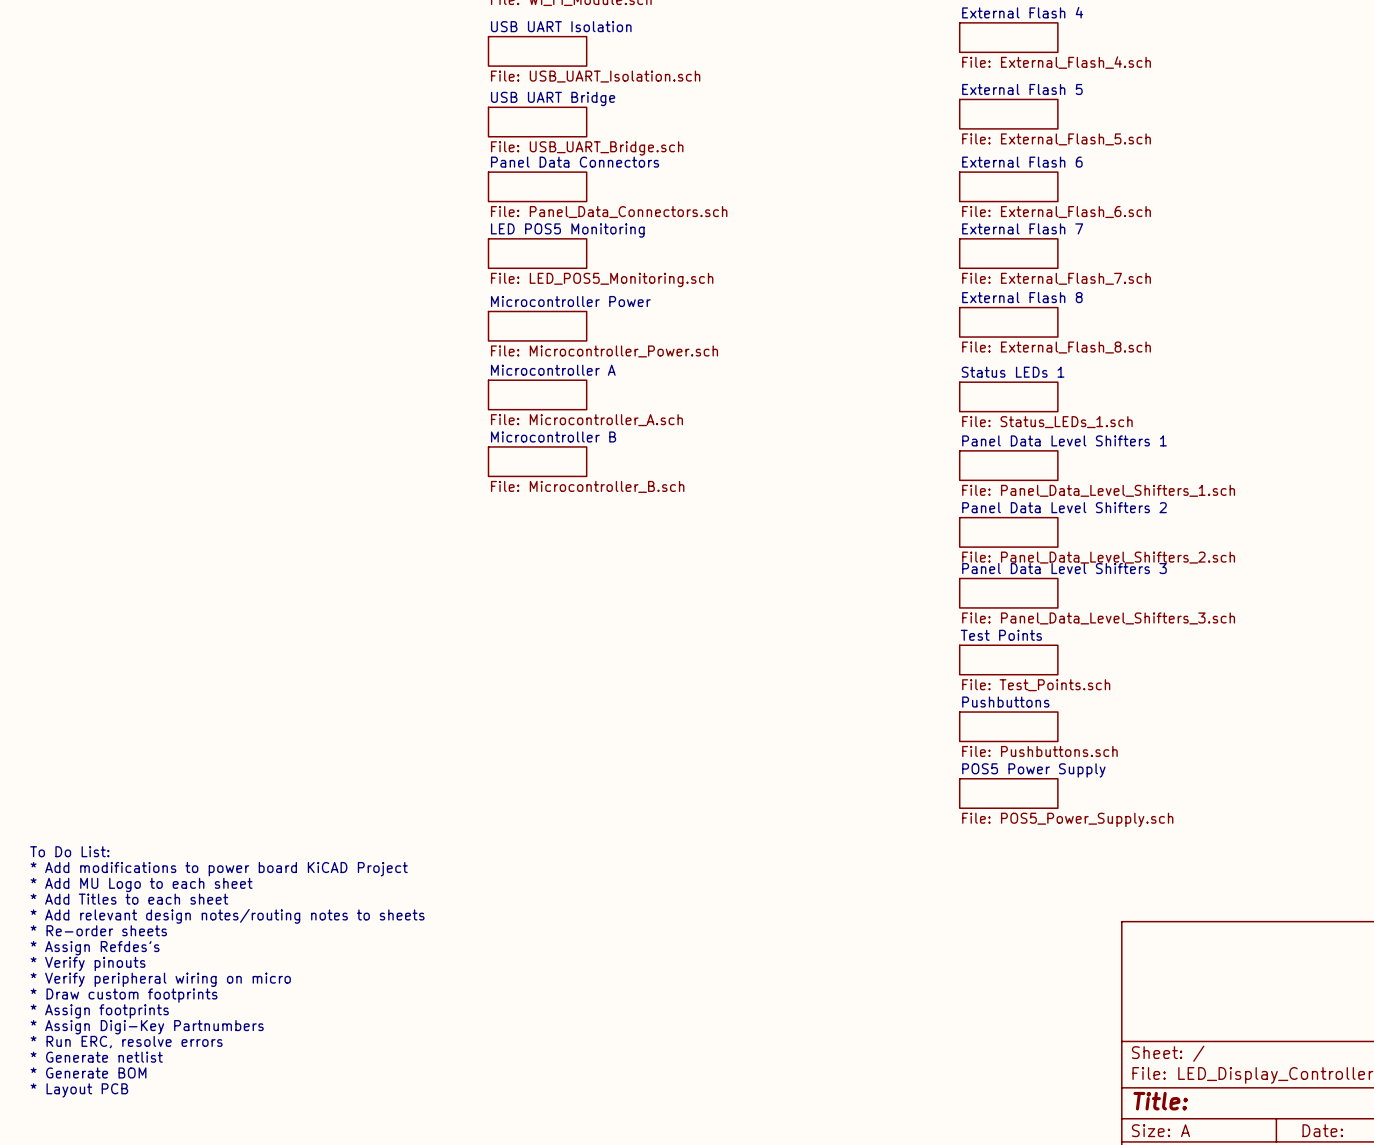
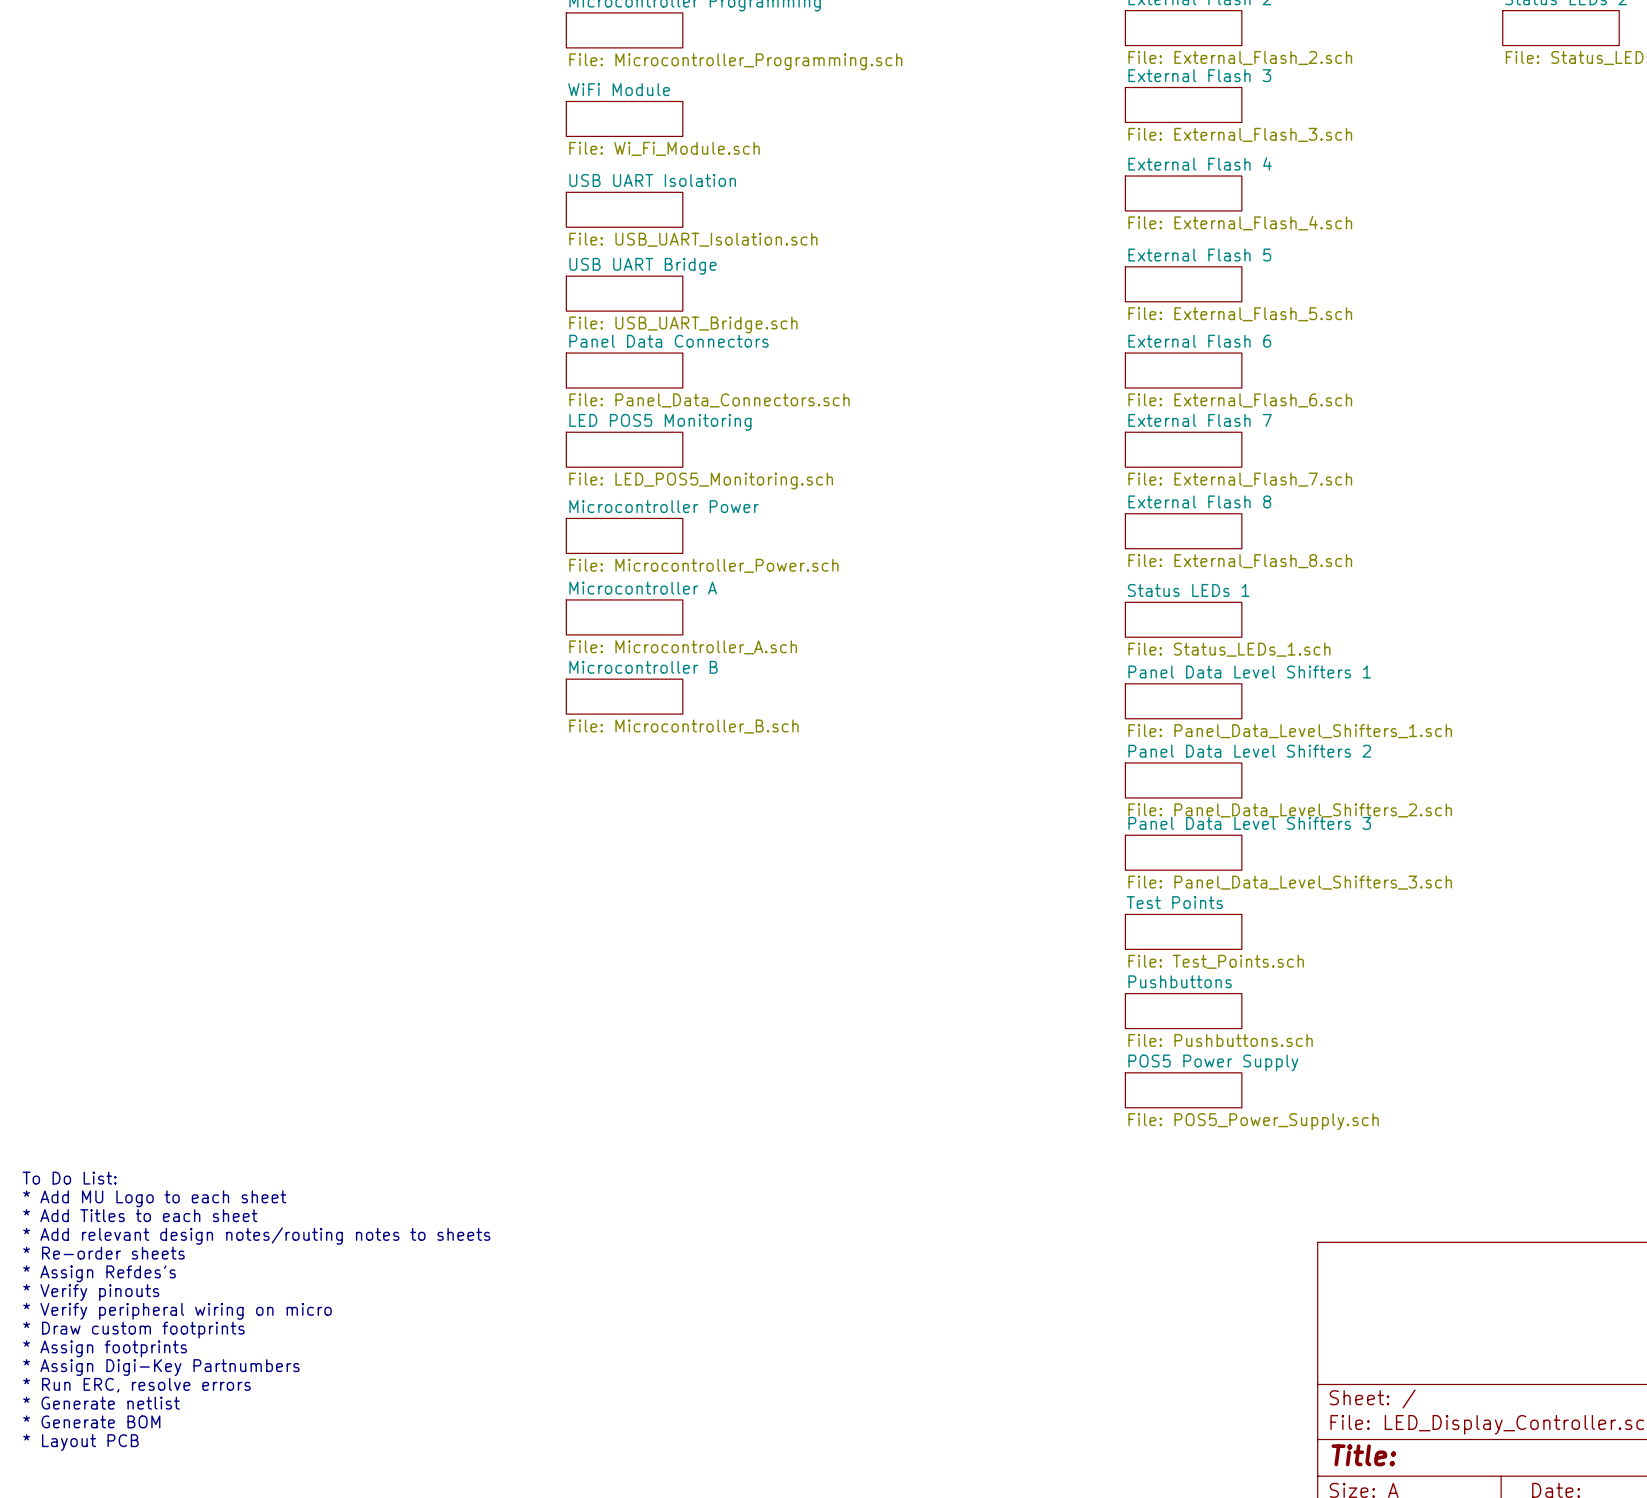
text: To Do List: (69, 851) -> none
text: * Add modifications to power board KiCAD Project (219, 869) -> To Do List: (69, 1178)

